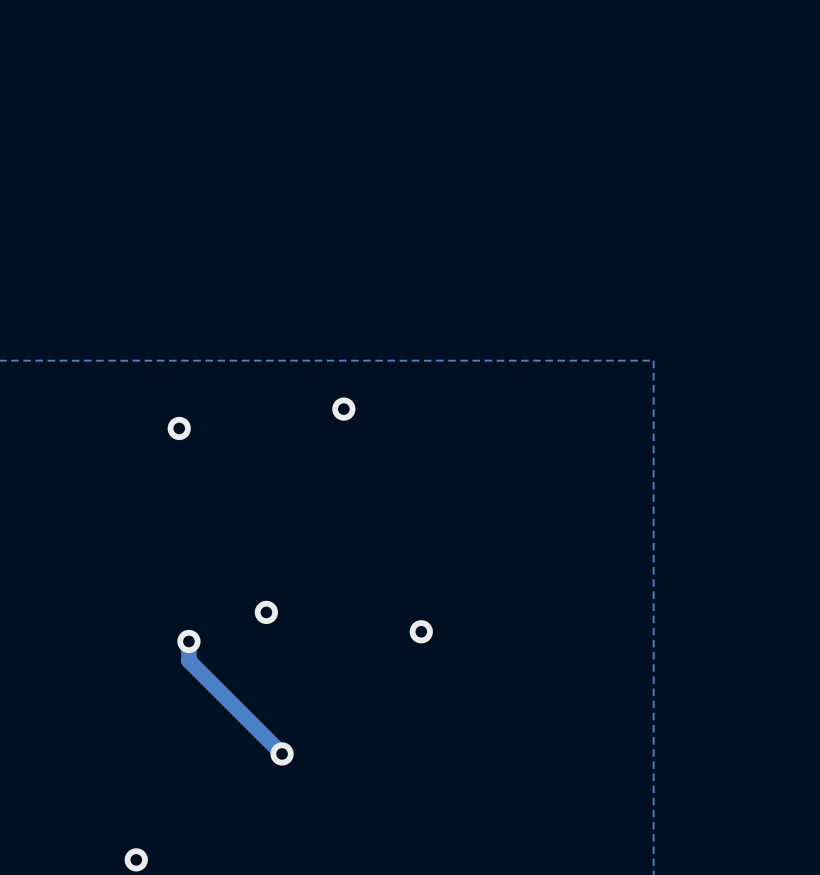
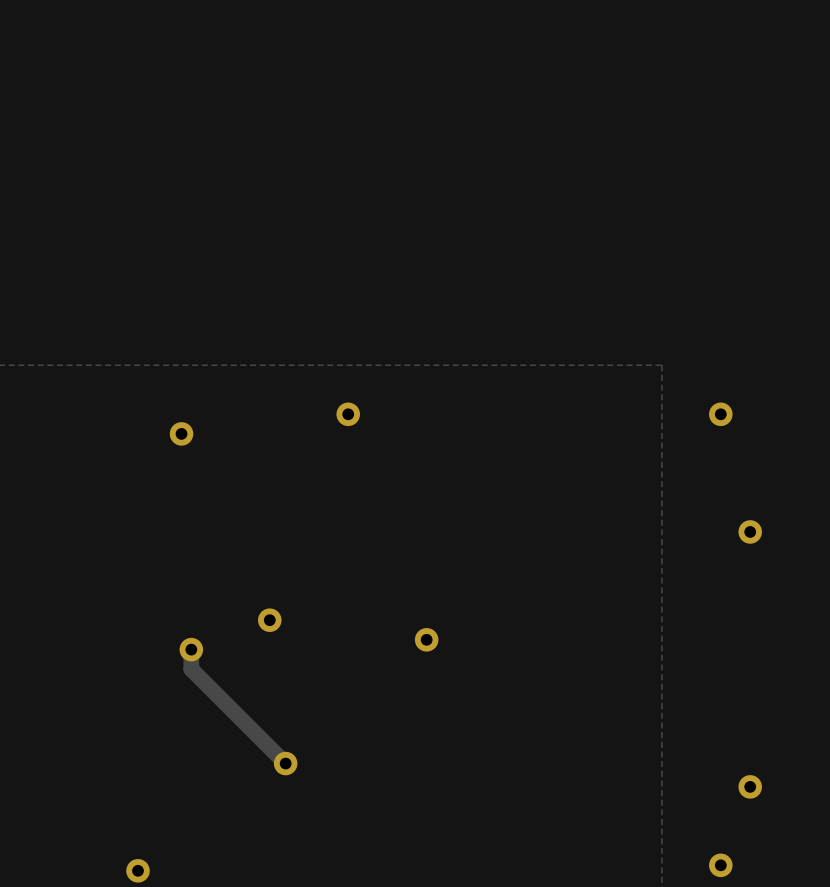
via: none -> (720, 414)
via: none -> (750, 531)
via: none -> (750, 786)
via: none -> (720, 865)

